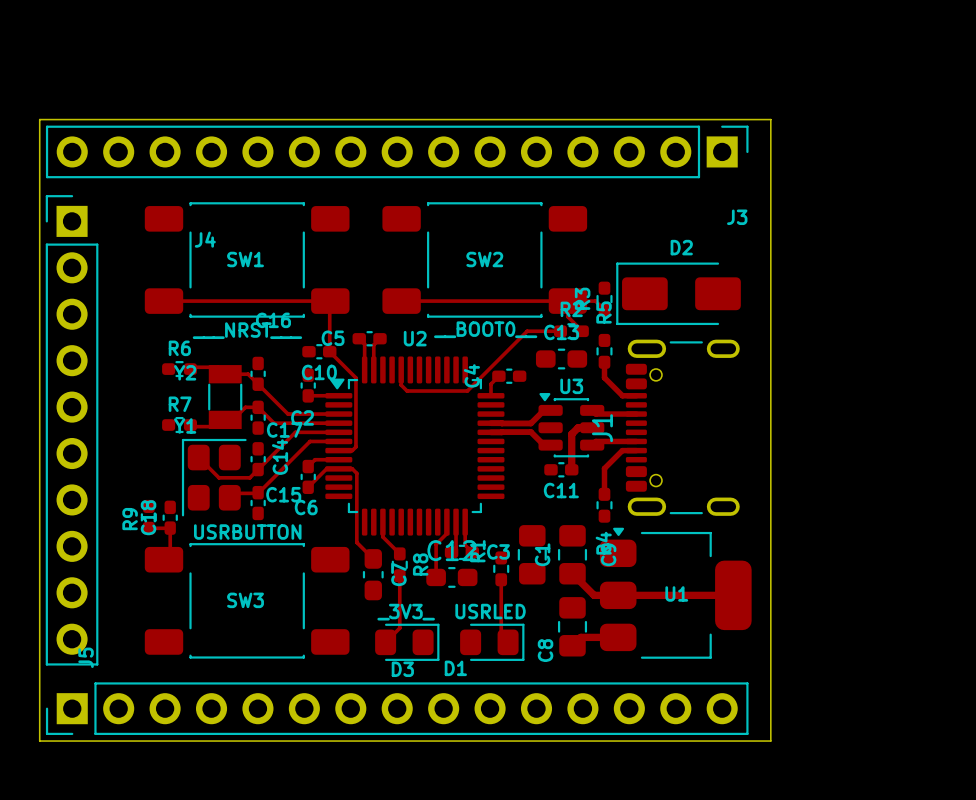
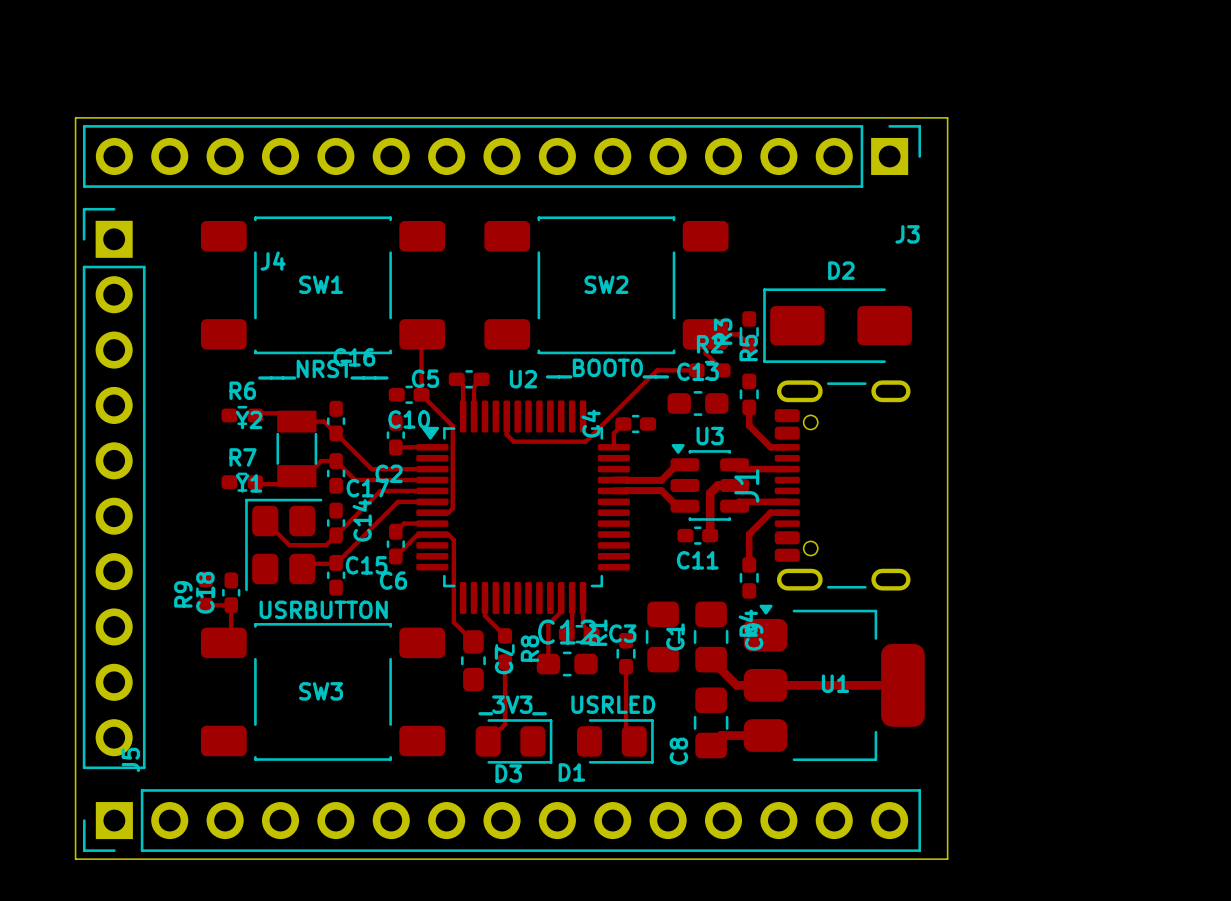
top track: (164, 301) (330, 301) -> none
top track: (401, 301) (567, 301) -> none

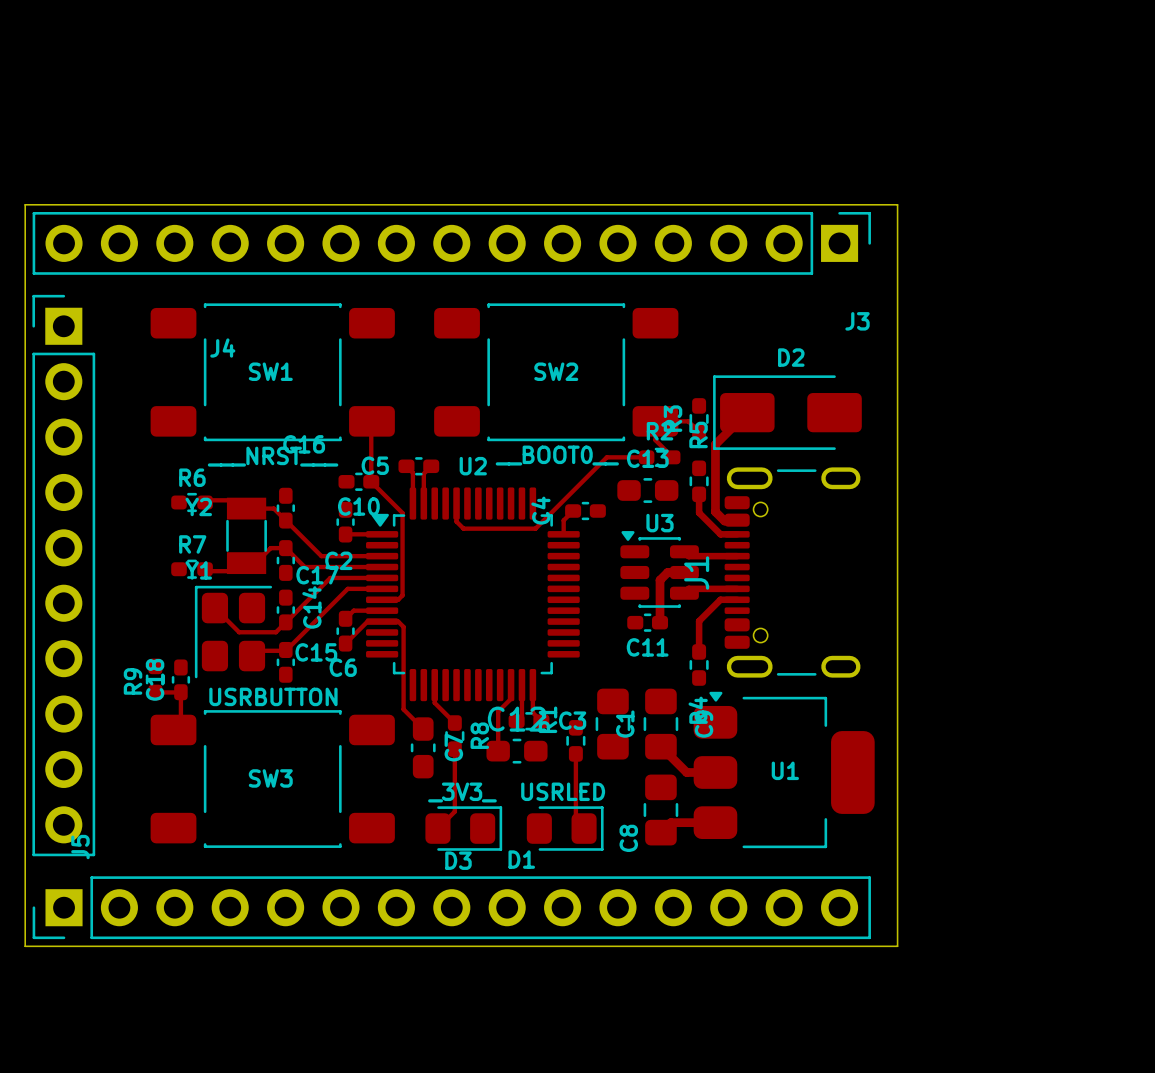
top track: none -> (747, 412) (715, 444) (715, 511) (724, 521) (737, 521)
top track: (684, 464) (677, 464) (661, 480) (613, 480) -> none
top track: (613, 490) (661, 490) (677, 506) (684, 506) -> none
top track: (765, 685) (902, 685) -> none

